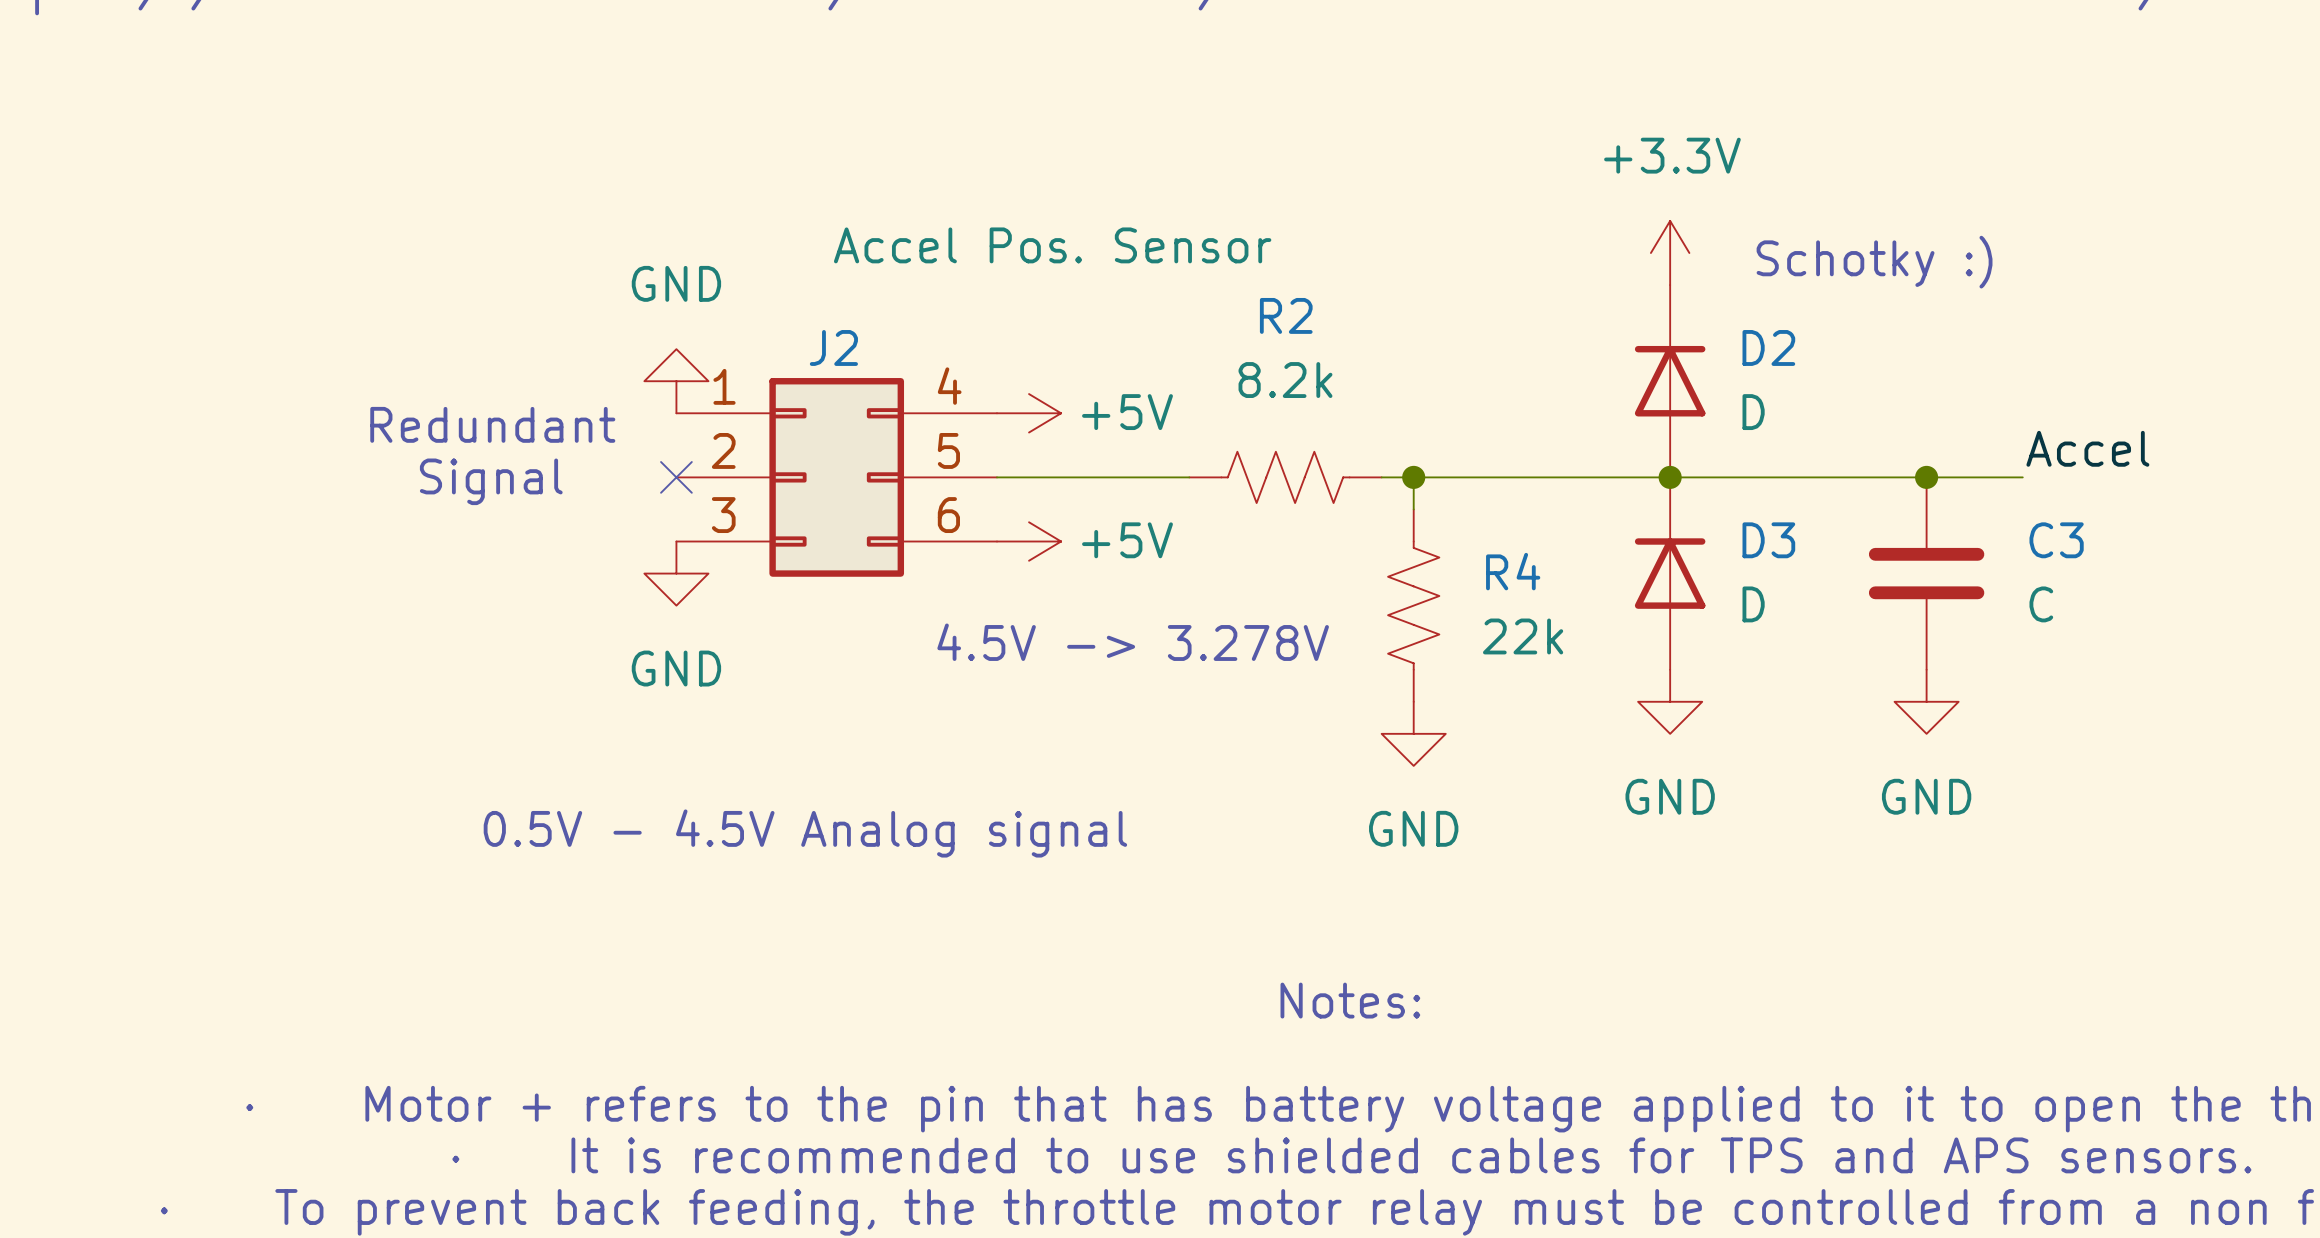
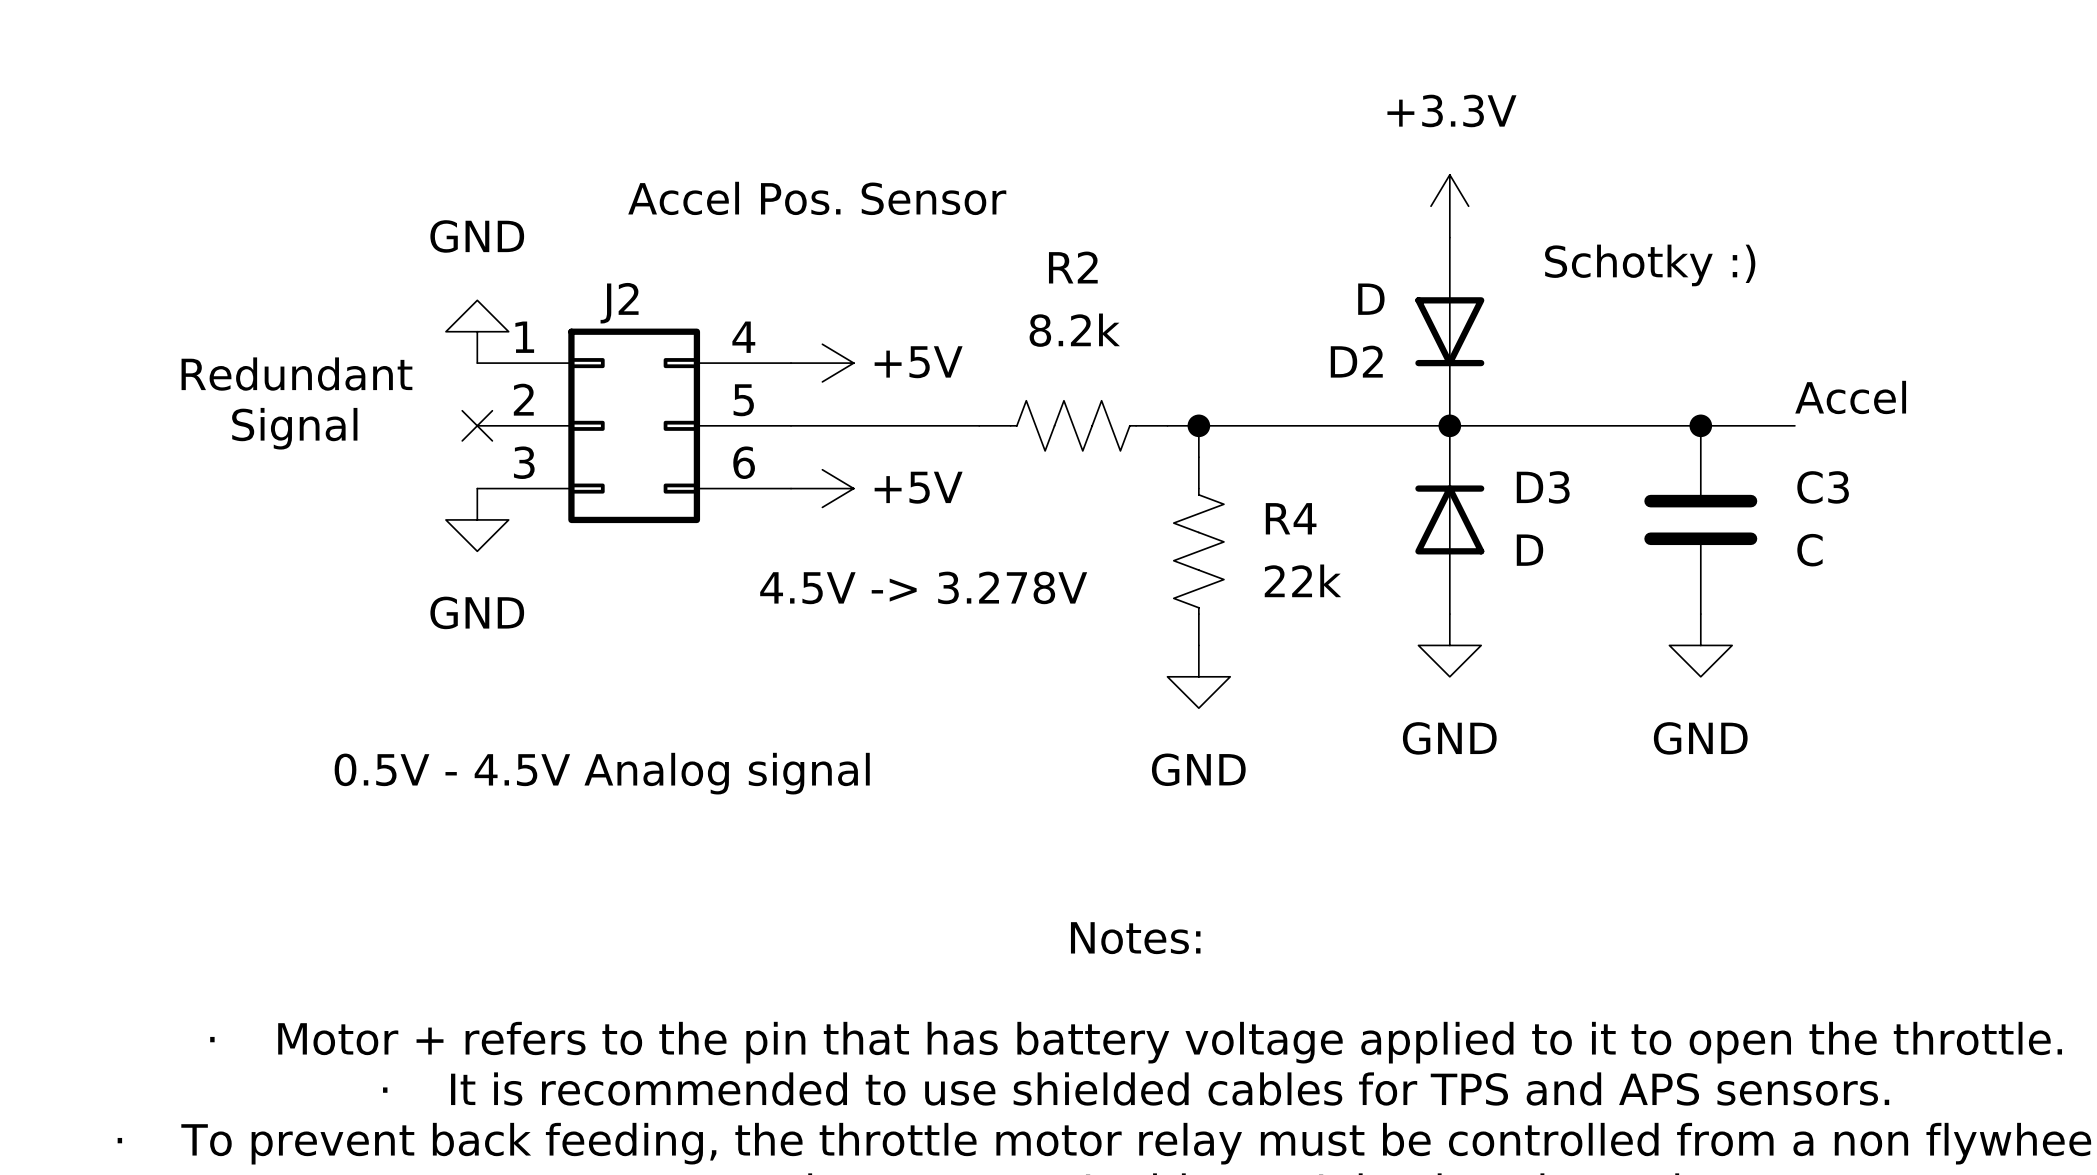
text position: Schotky :) (1874, 262) -> Schotky :) (1650, 265)
D2 rotation: 0° (1670, 381) -> 180° (1449, 331)

